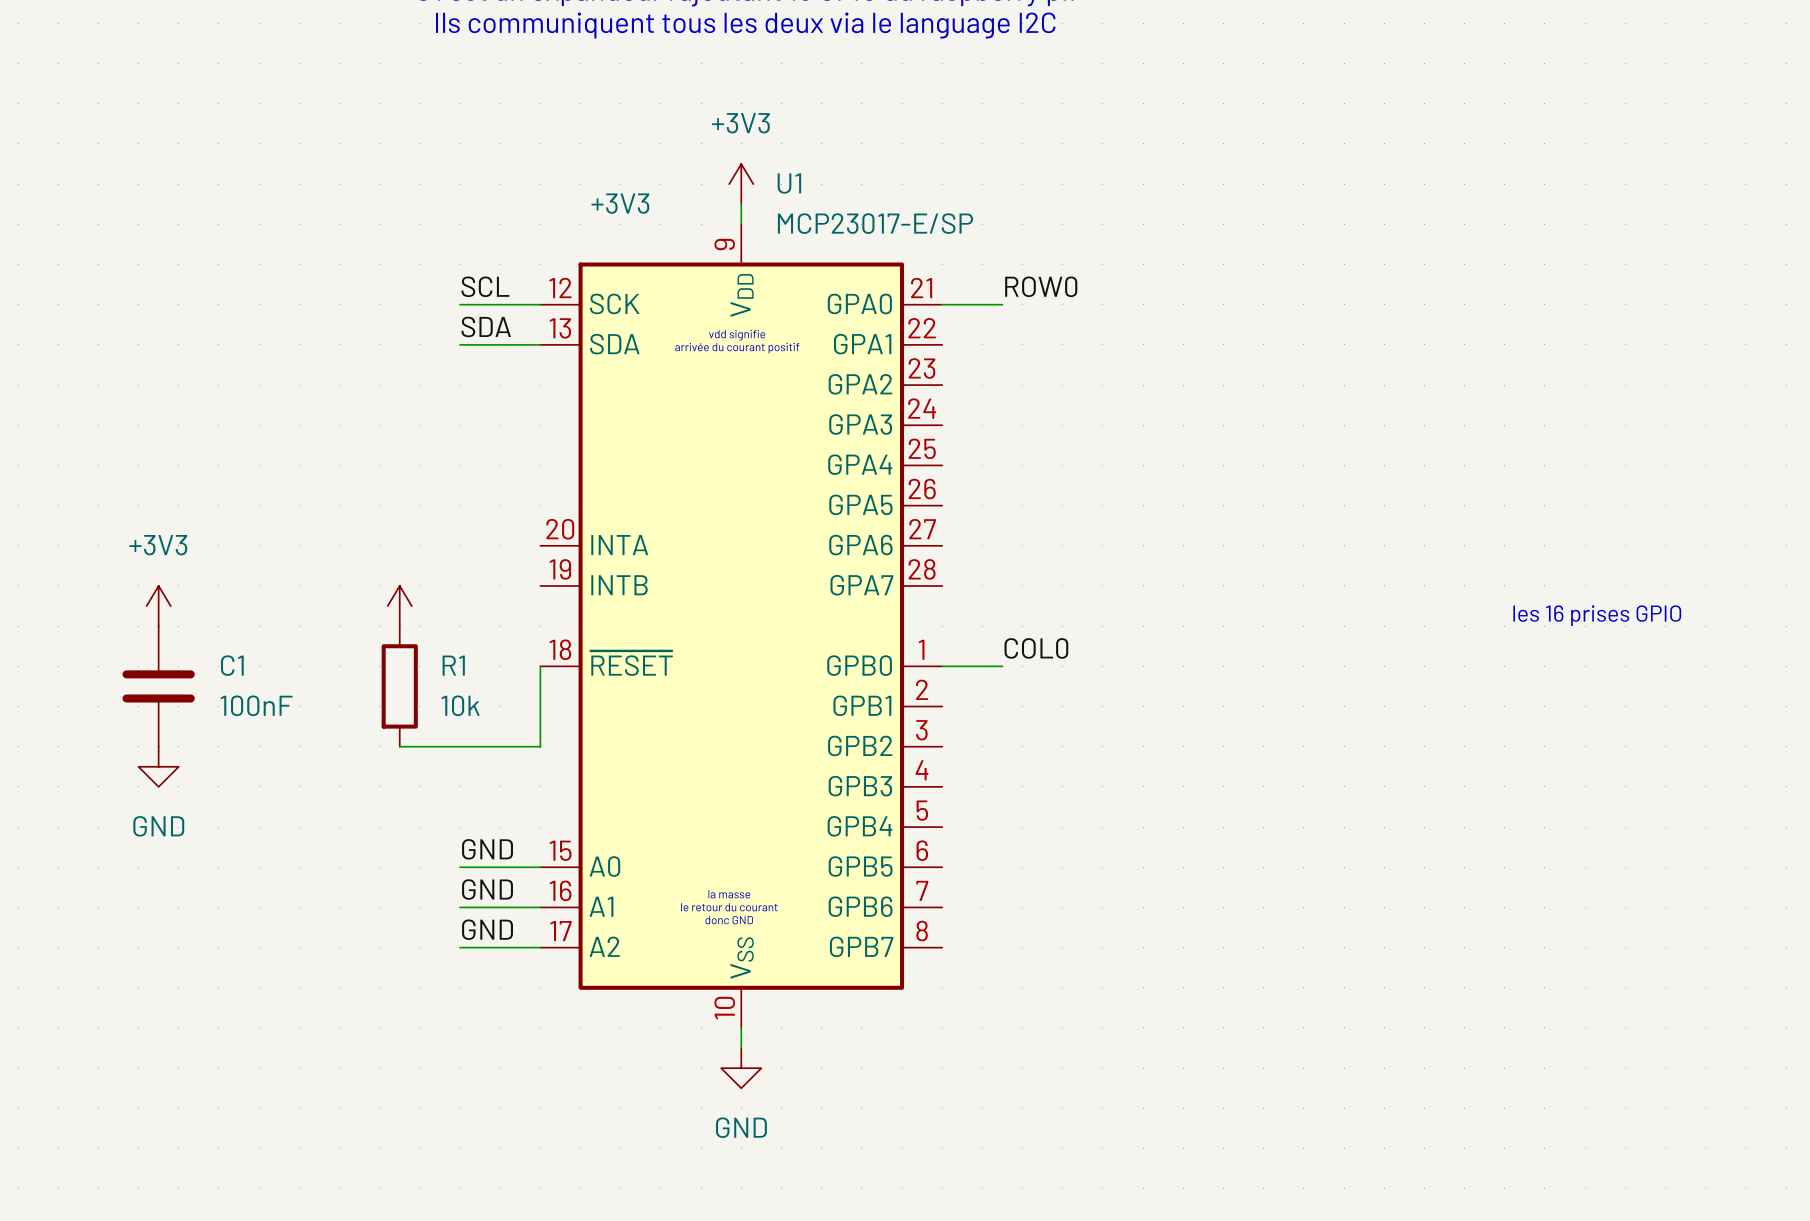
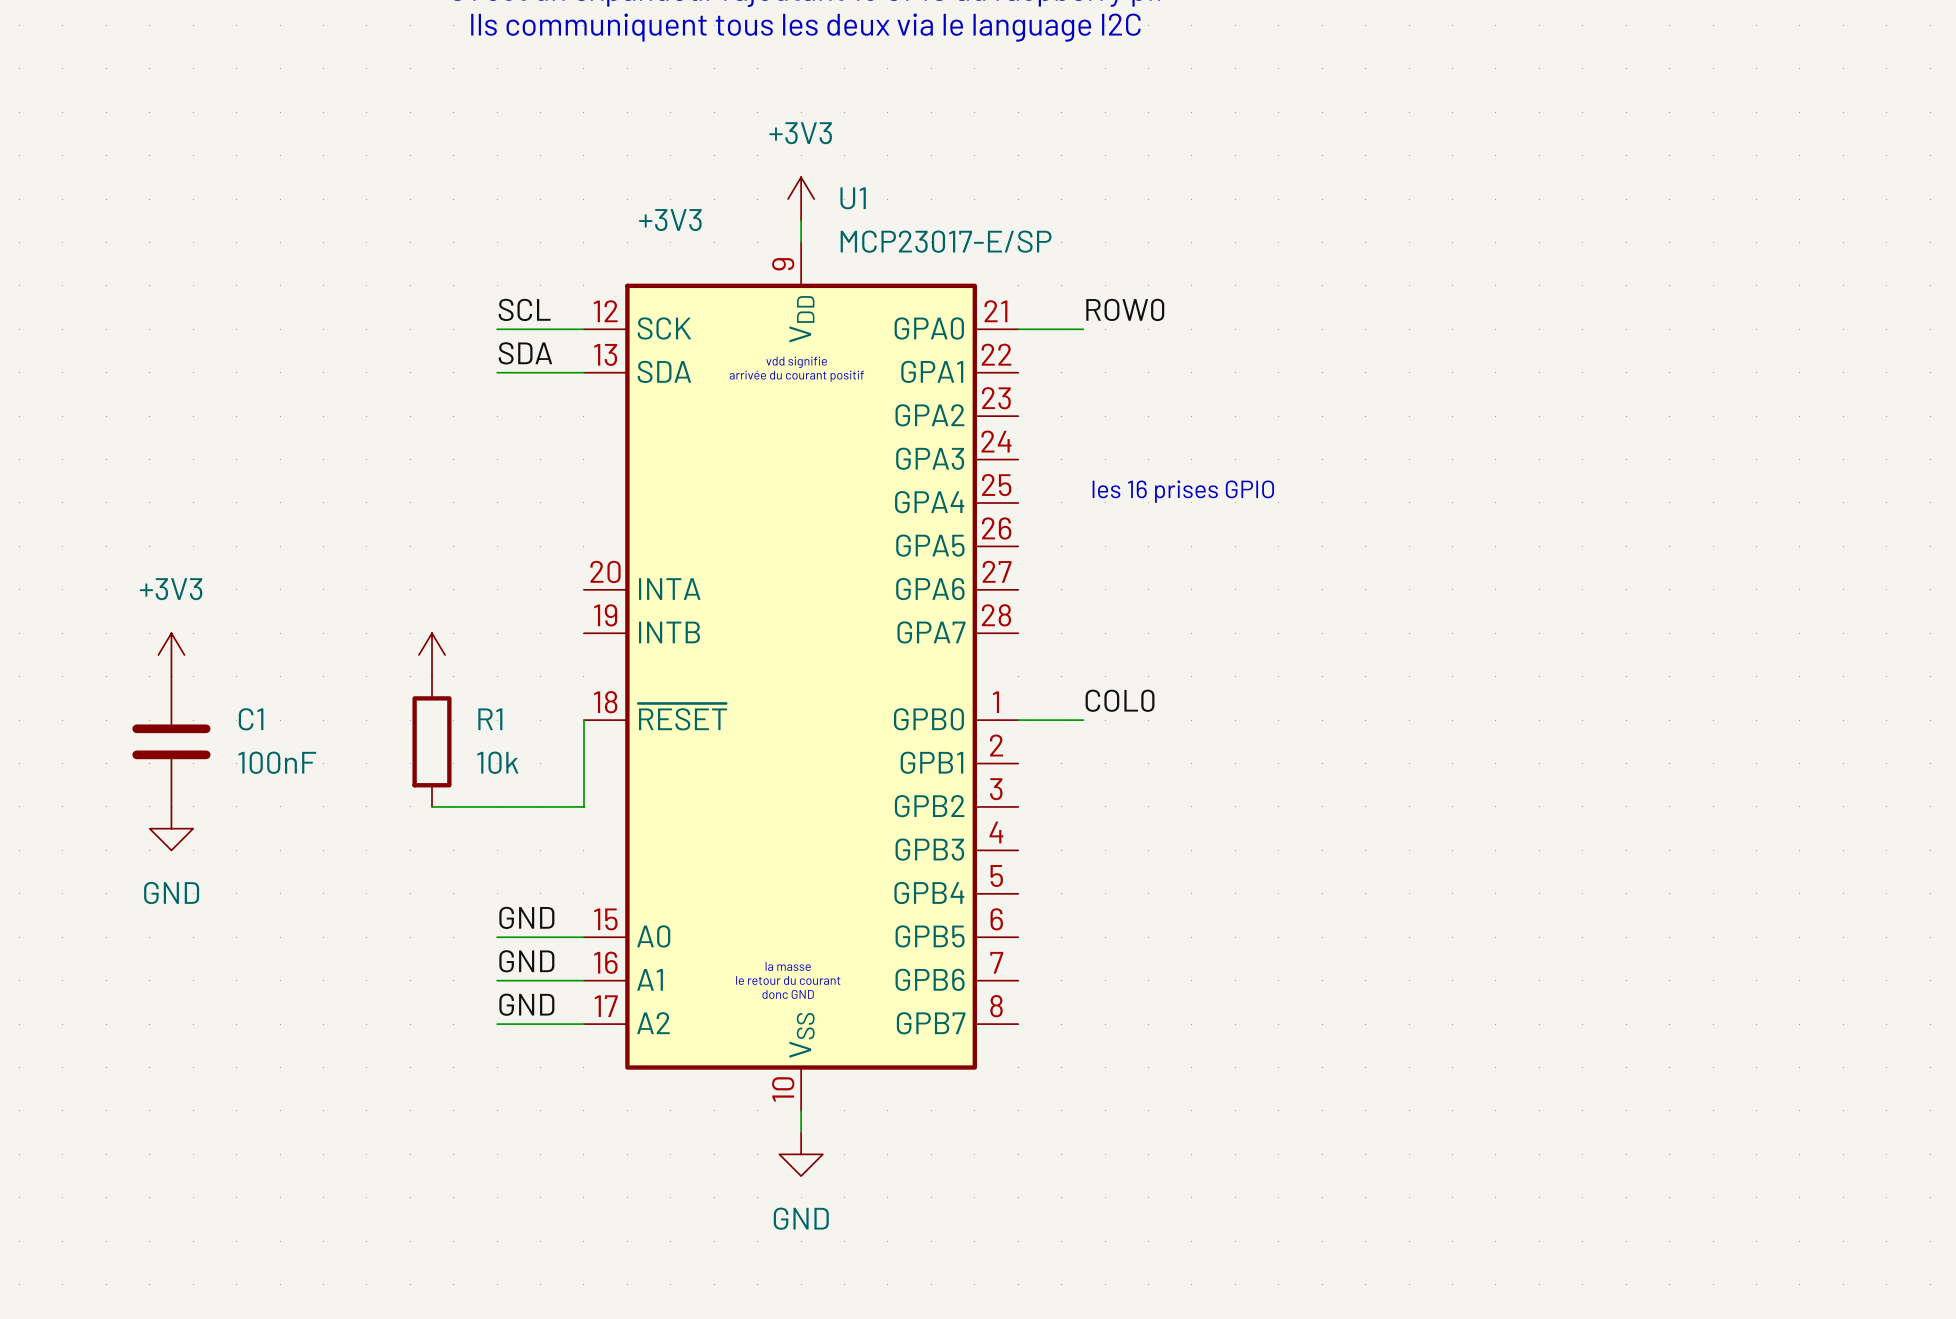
text: none -> les 16 prises GPIO (1183, 491)
text: les 16 prises GPIO (1597, 615) -> none

